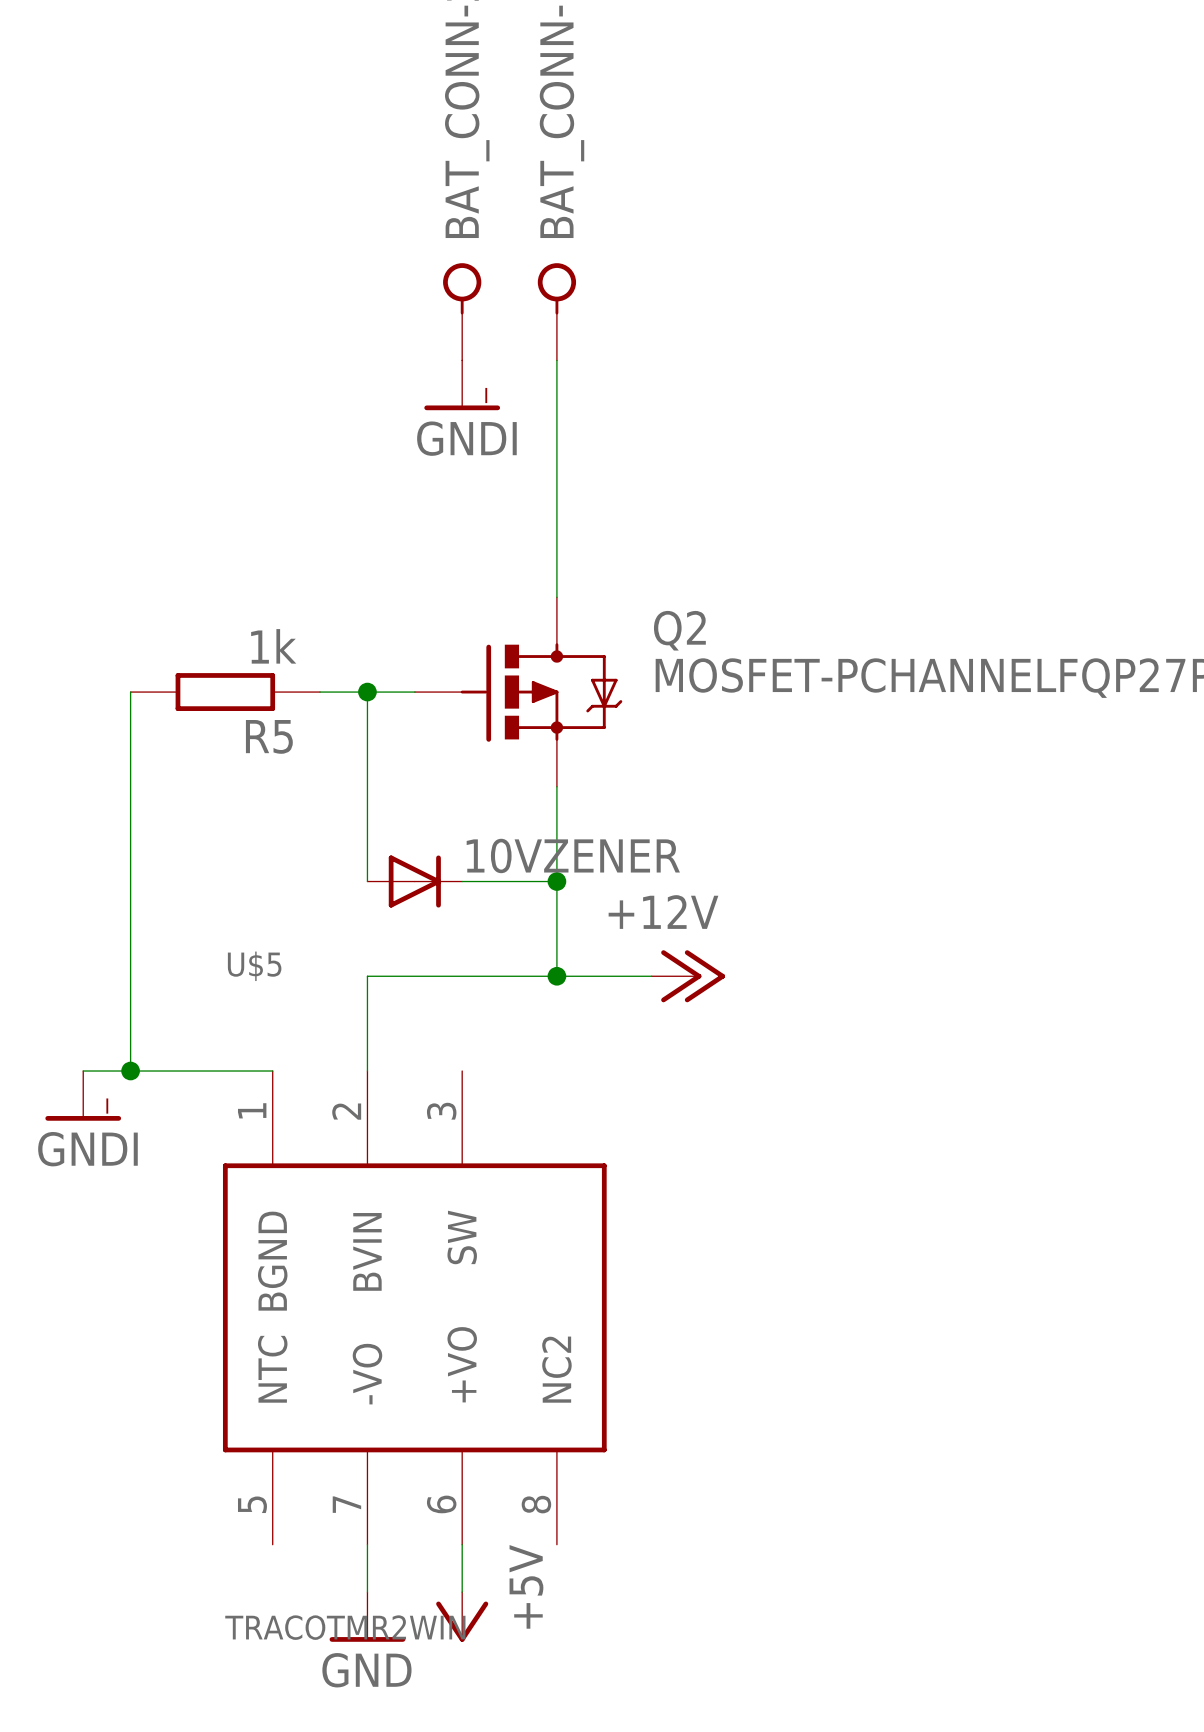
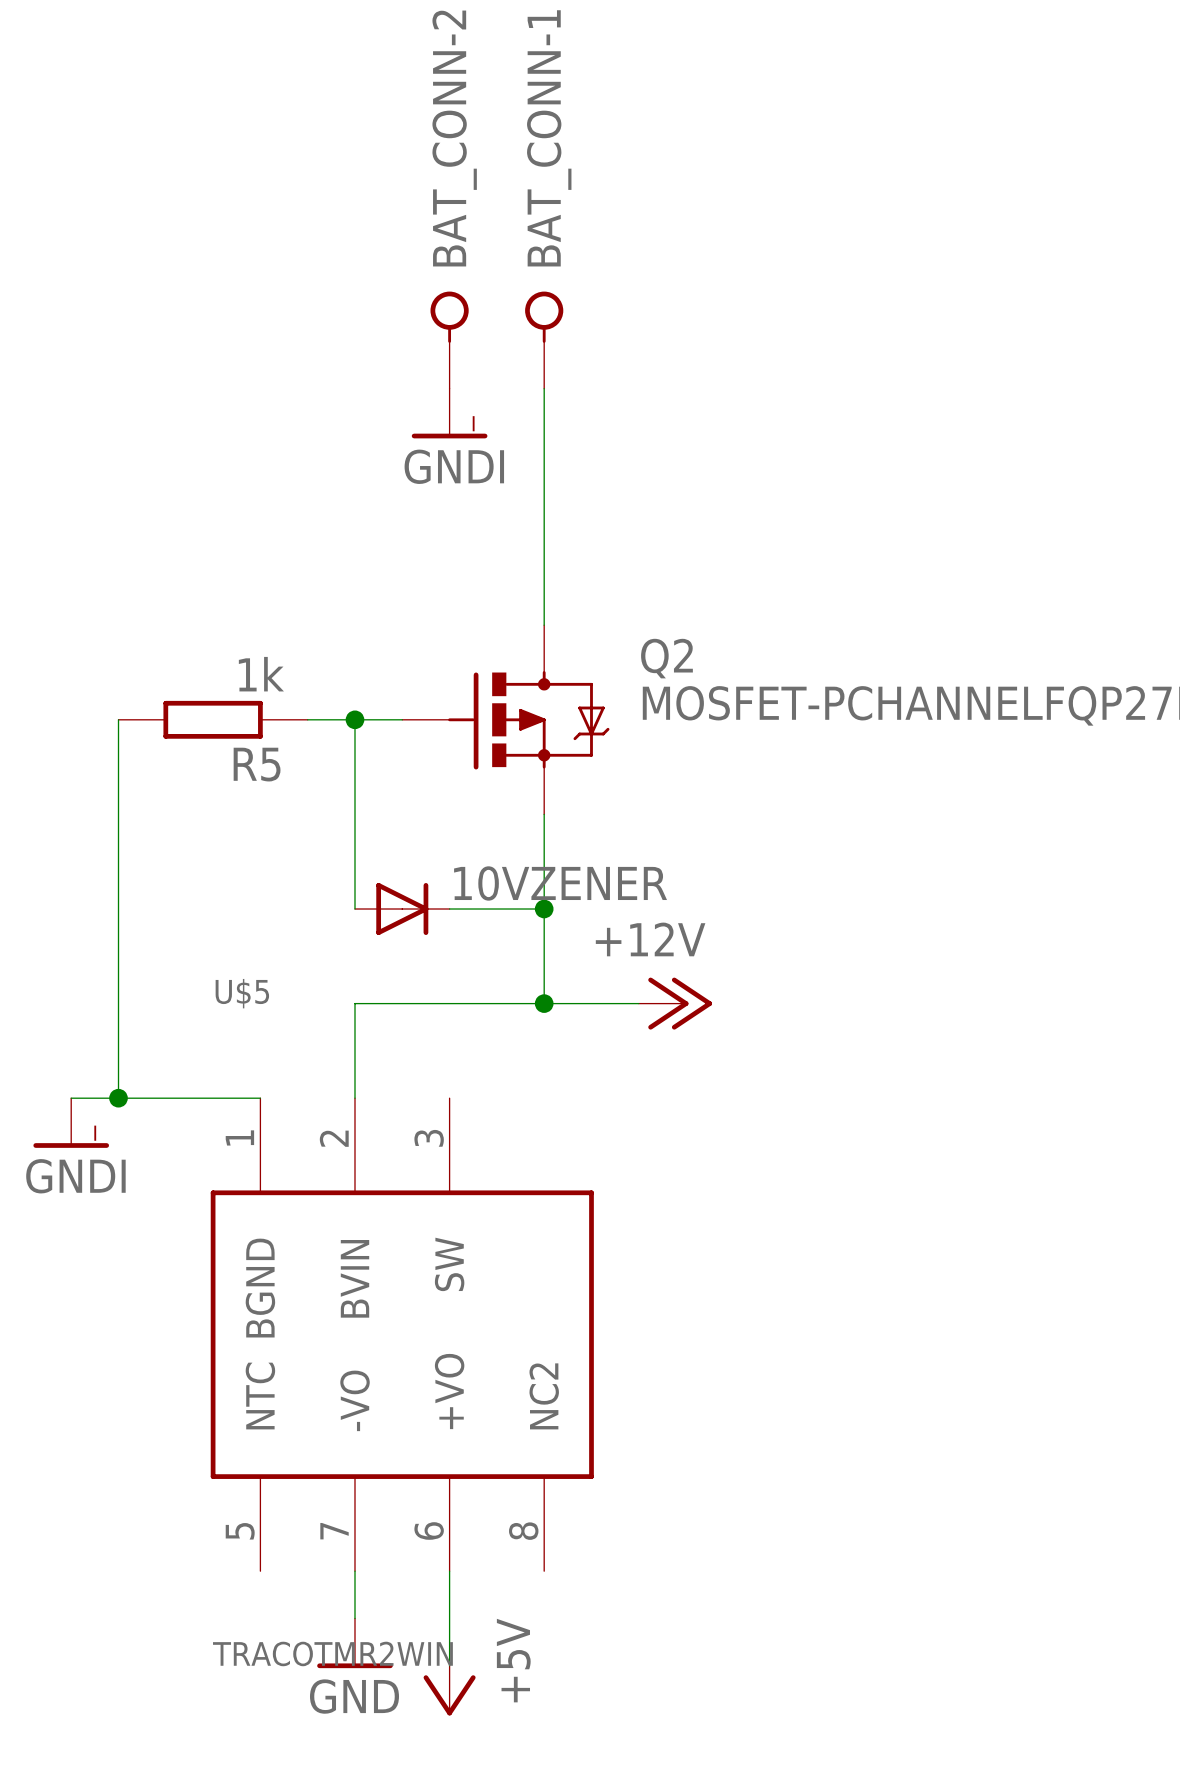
power symbol position: +5V (462, 1616) -> +5V (449, 1690)

